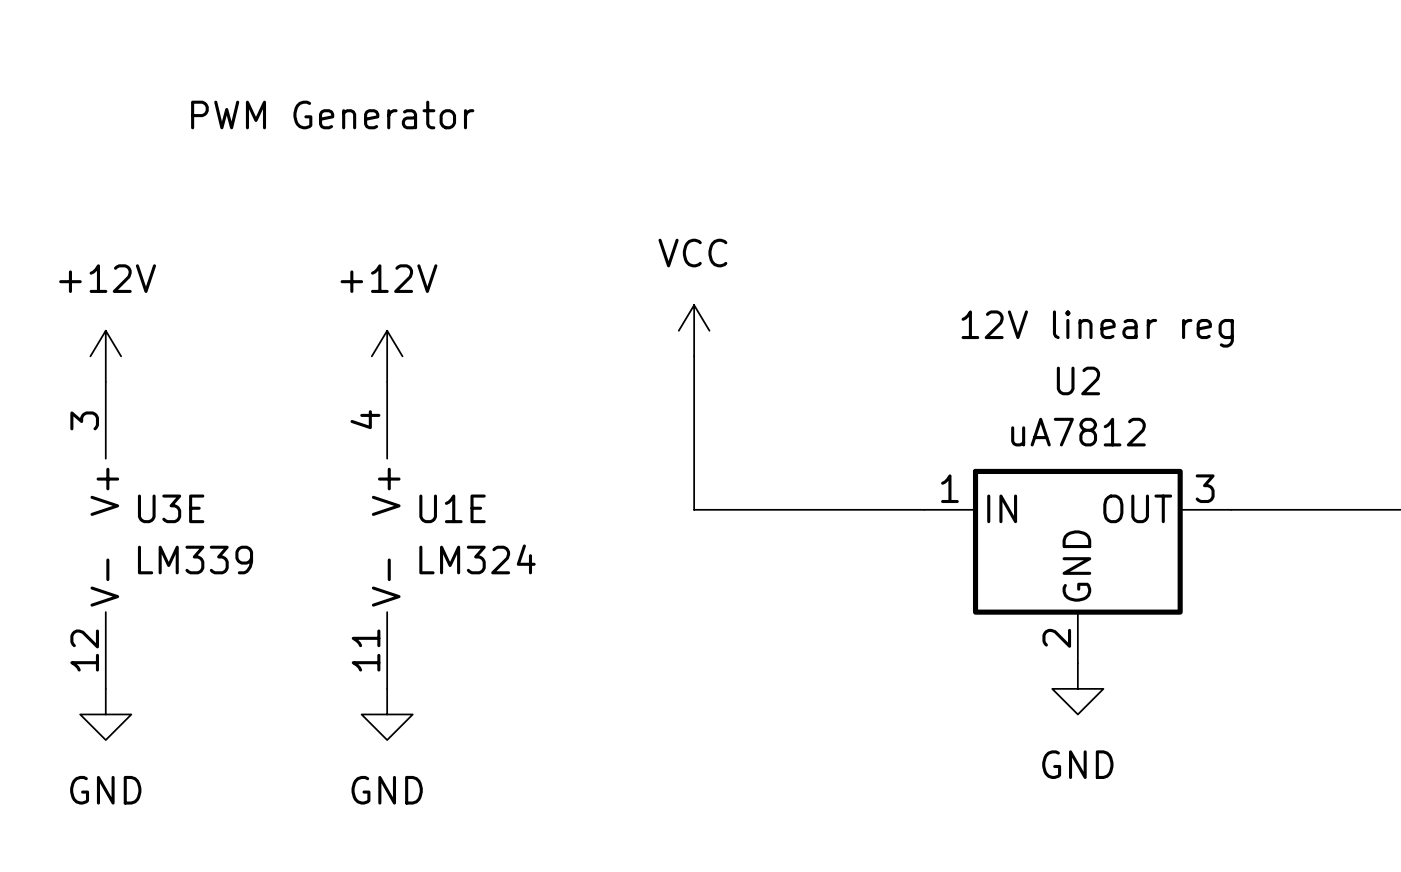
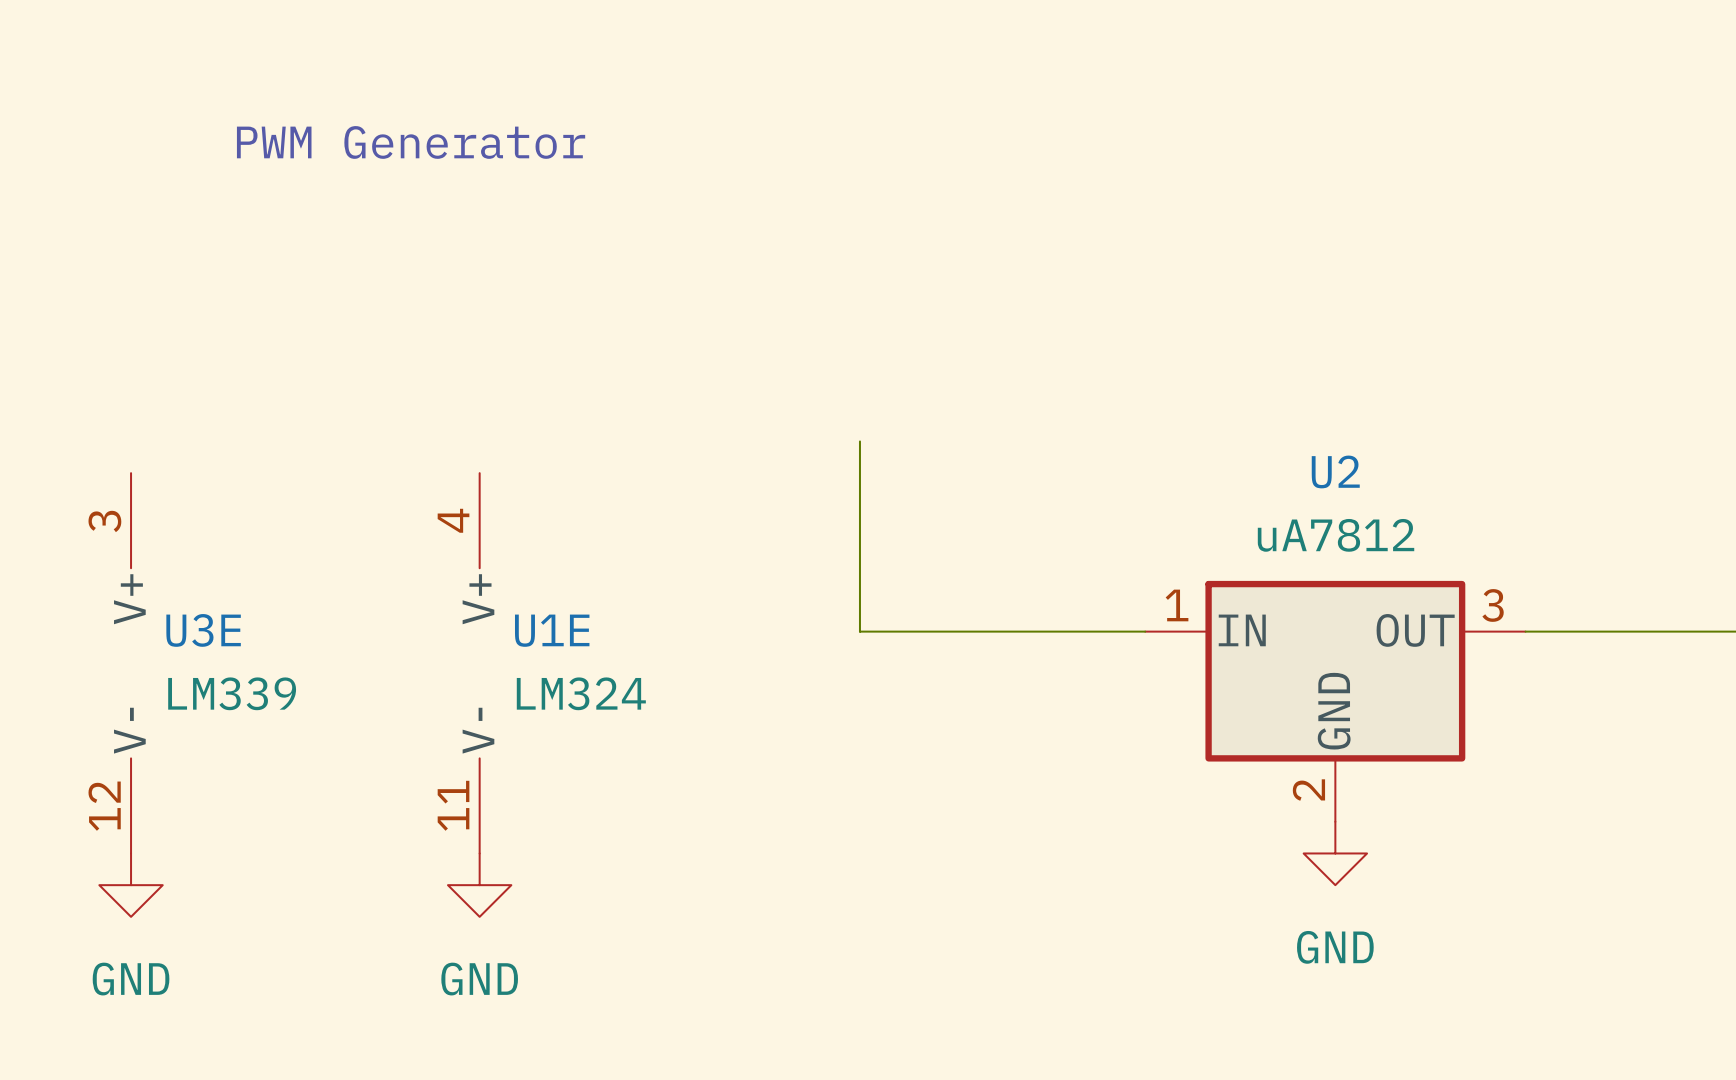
text: 12V linear reg (1097, 329) -> none
power symbol: VCC (694, 330) -> none
power symbol: +12V (105, 356) -> none
power symbol: +12V (387, 356) -> none

